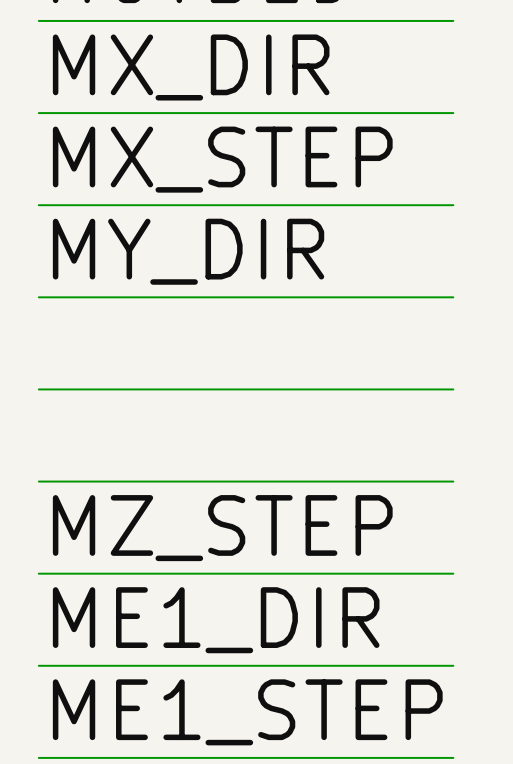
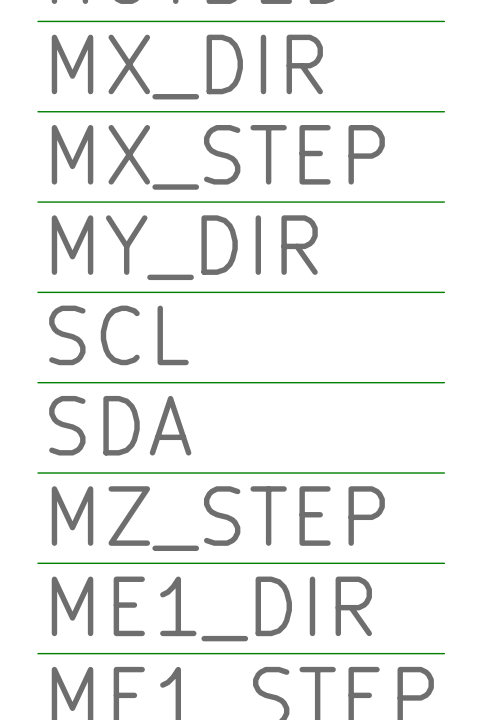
label: none -> SCL (118, 335)
label: none -> SDA (120, 425)

